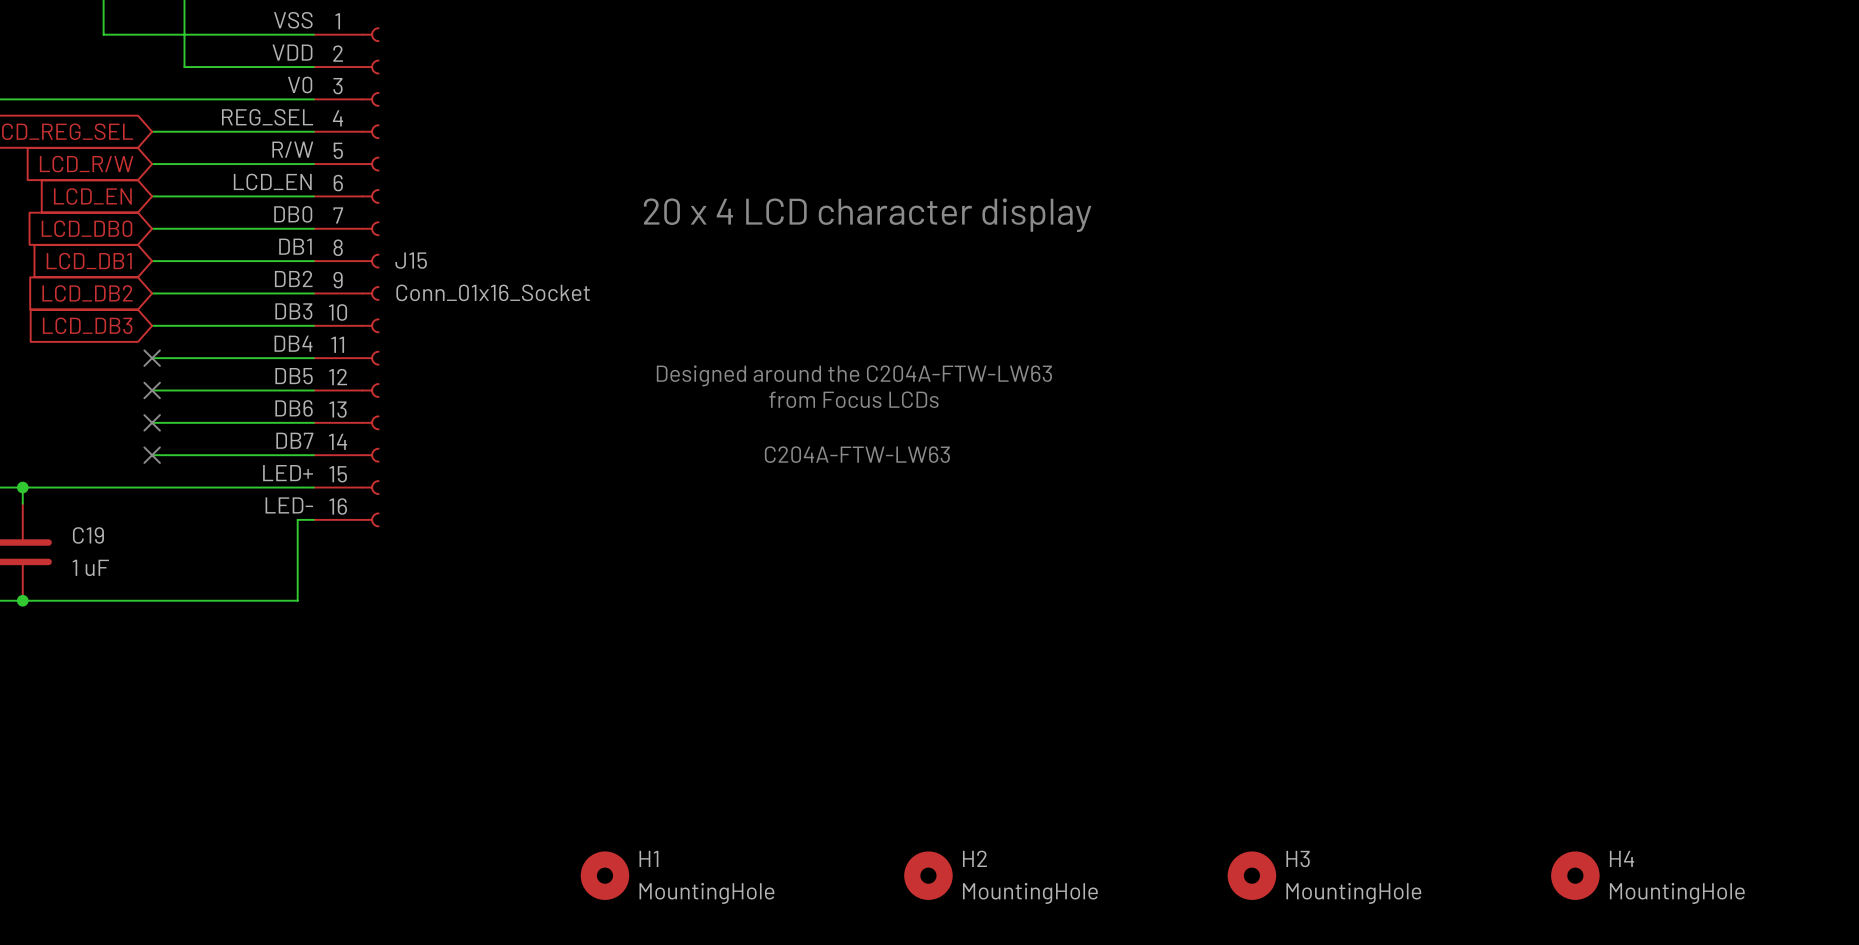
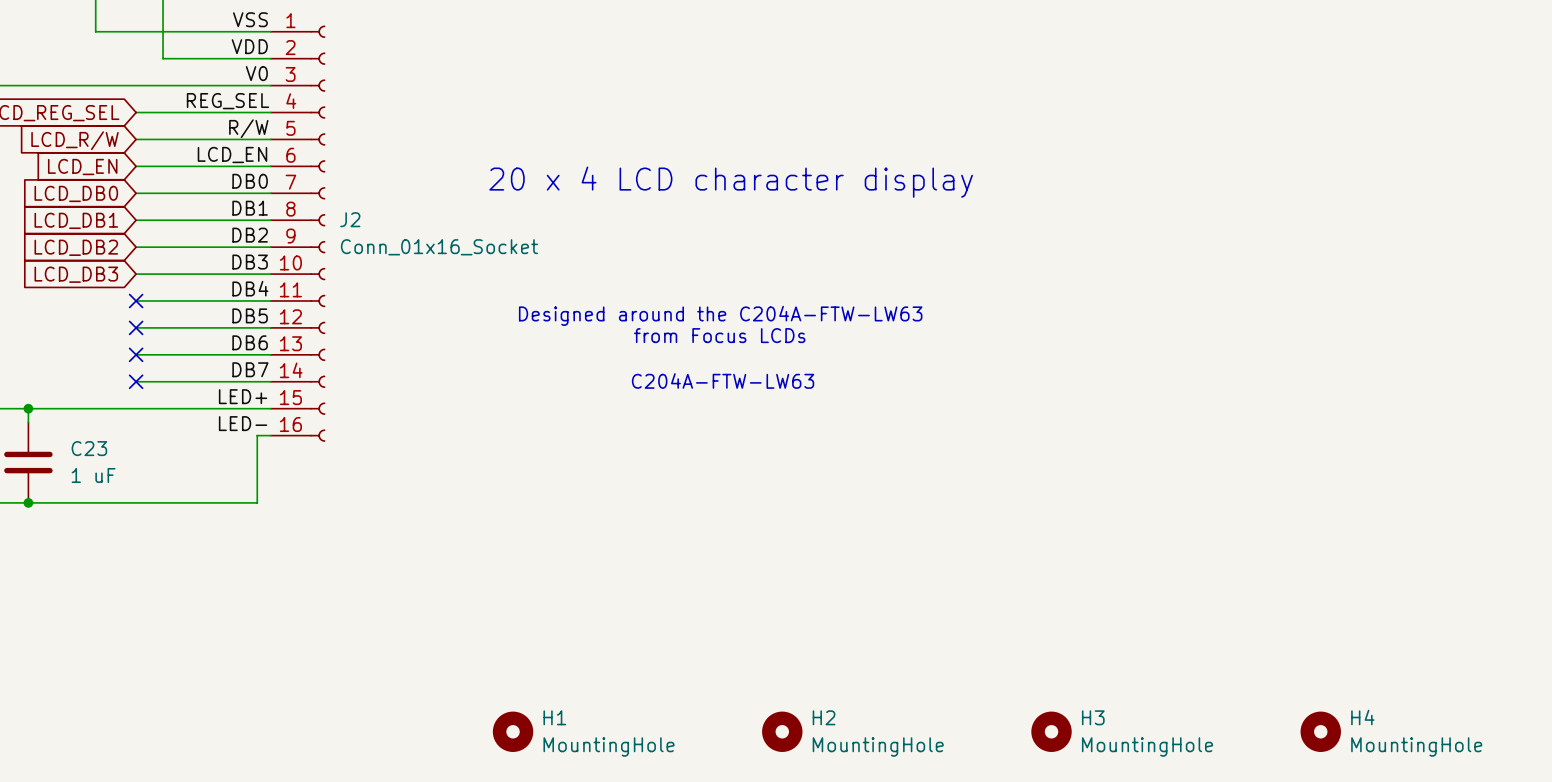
J15 name: J15 (411, 260) -> J2 (350, 219)
C19 name: C19 (88, 535) -> C23 (89, 448)

